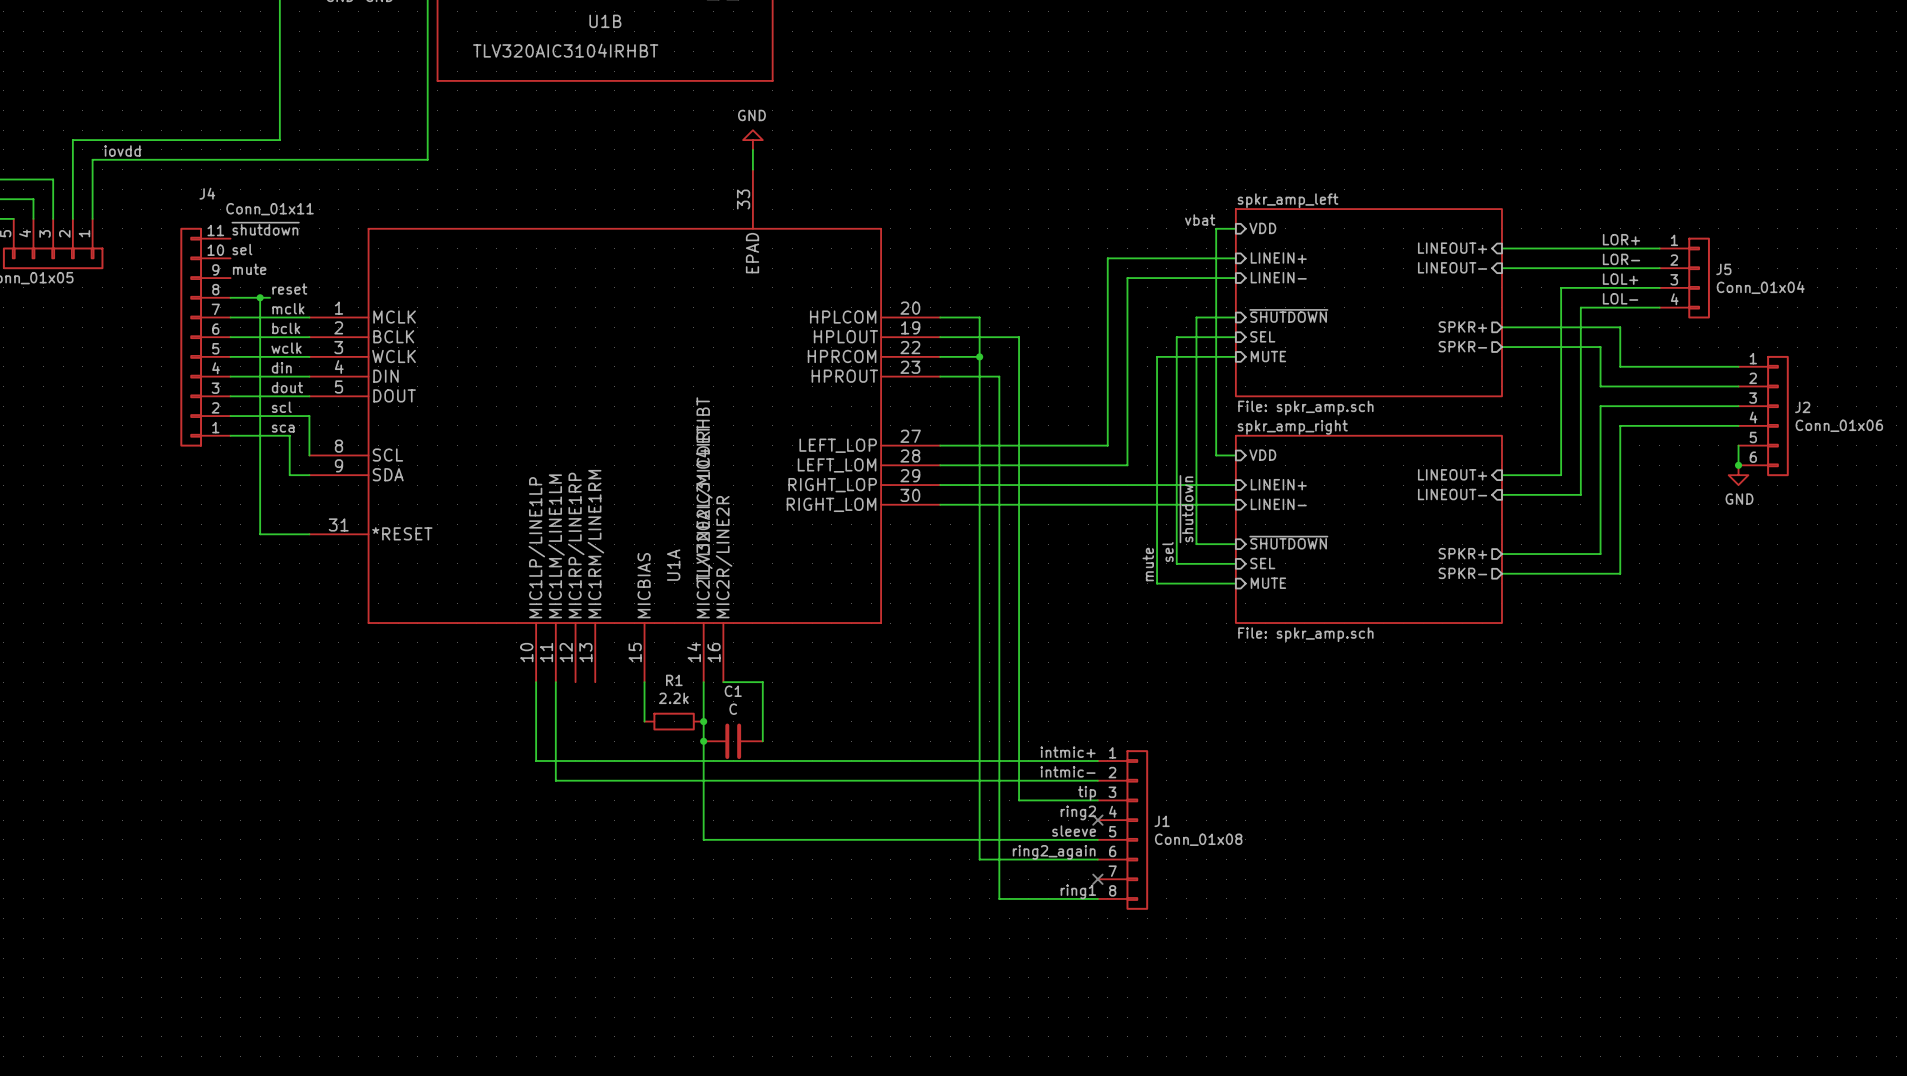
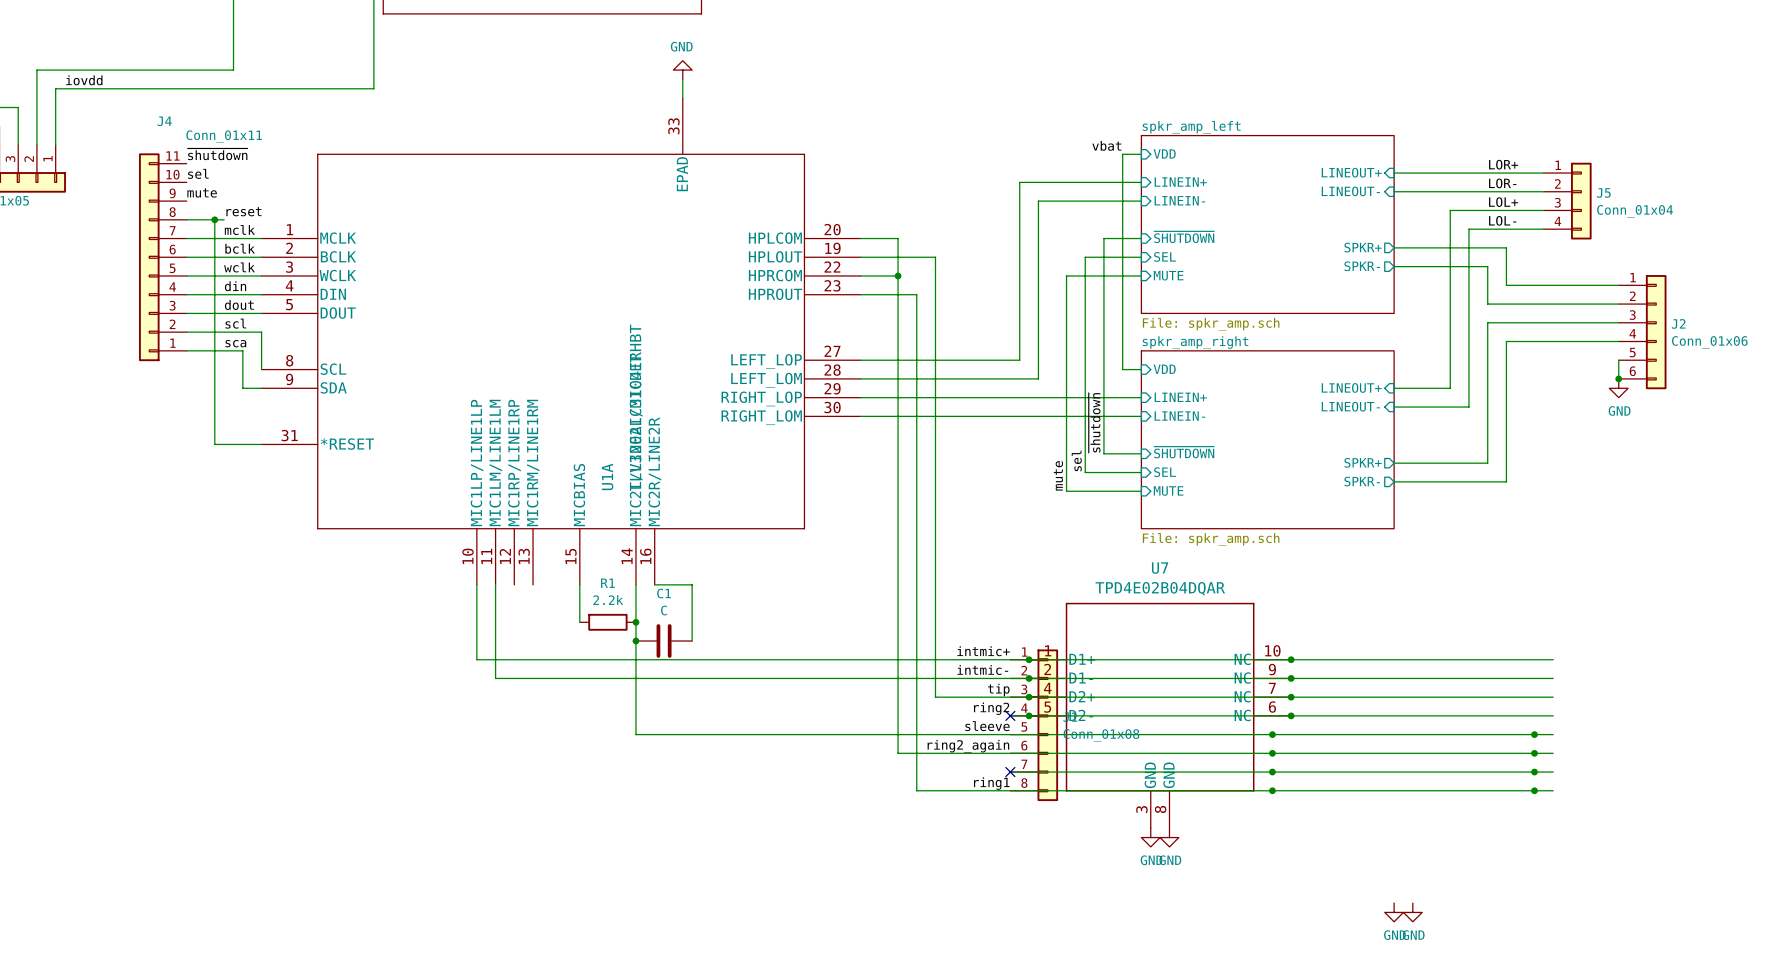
wire: none -> (1010, 659) (1553, 659)
junction: none -> (1029, 659)
junction: none -> (1291, 659)
wire: none -> (1010, 678) (1553, 678)
junction: none -> (1029, 678)
junction: none -> (1291, 678)
wire: none -> (1010, 697) (1553, 697)
junction: none -> (1029, 697)
junction: none -> (1291, 697)
U7: none -> TPD4E02B04DQAR (1160, 715)
wire: none -> (1010, 715) (1553, 715)
junction: none -> (1029, 715)
junction: none -> (1291, 715)
wire: none -> (1010, 734) (1553, 734)
junction: none -> (1272, 734)
junction: none -> (1534, 734)
wire: none -> (1010, 753) (1553, 753)
junction: none -> (1272, 753)
junction: none -> (1534, 753)
wire: none -> (1010, 772) (1553, 772)
junction: none -> (1272, 772)
junction: none -> (1534, 772)
wire: none -> (1010, 790) (1553, 790)
junction: none -> (1272, 790)
junction: none -> (1534, 790)
power symbol: none -> GND (1150, 837)
power symbol: none -> GND (1169, 837)
power symbol: none -> GND (1394, 912)
power symbol: none -> GND (1412, 912)

